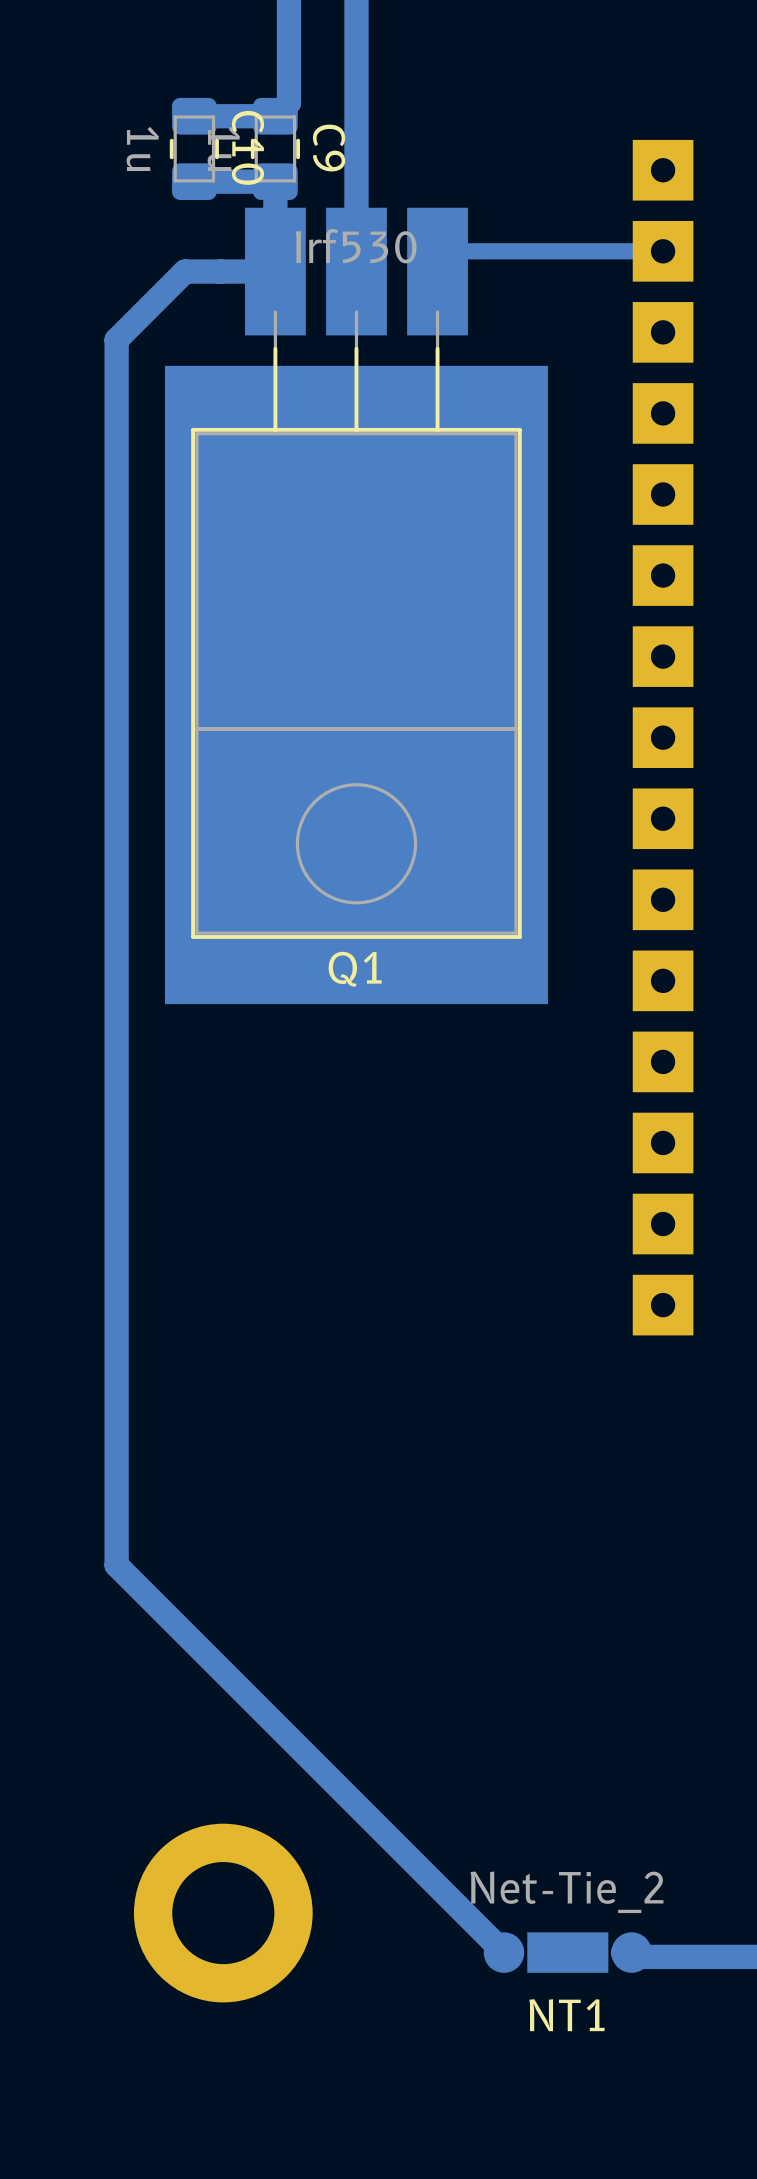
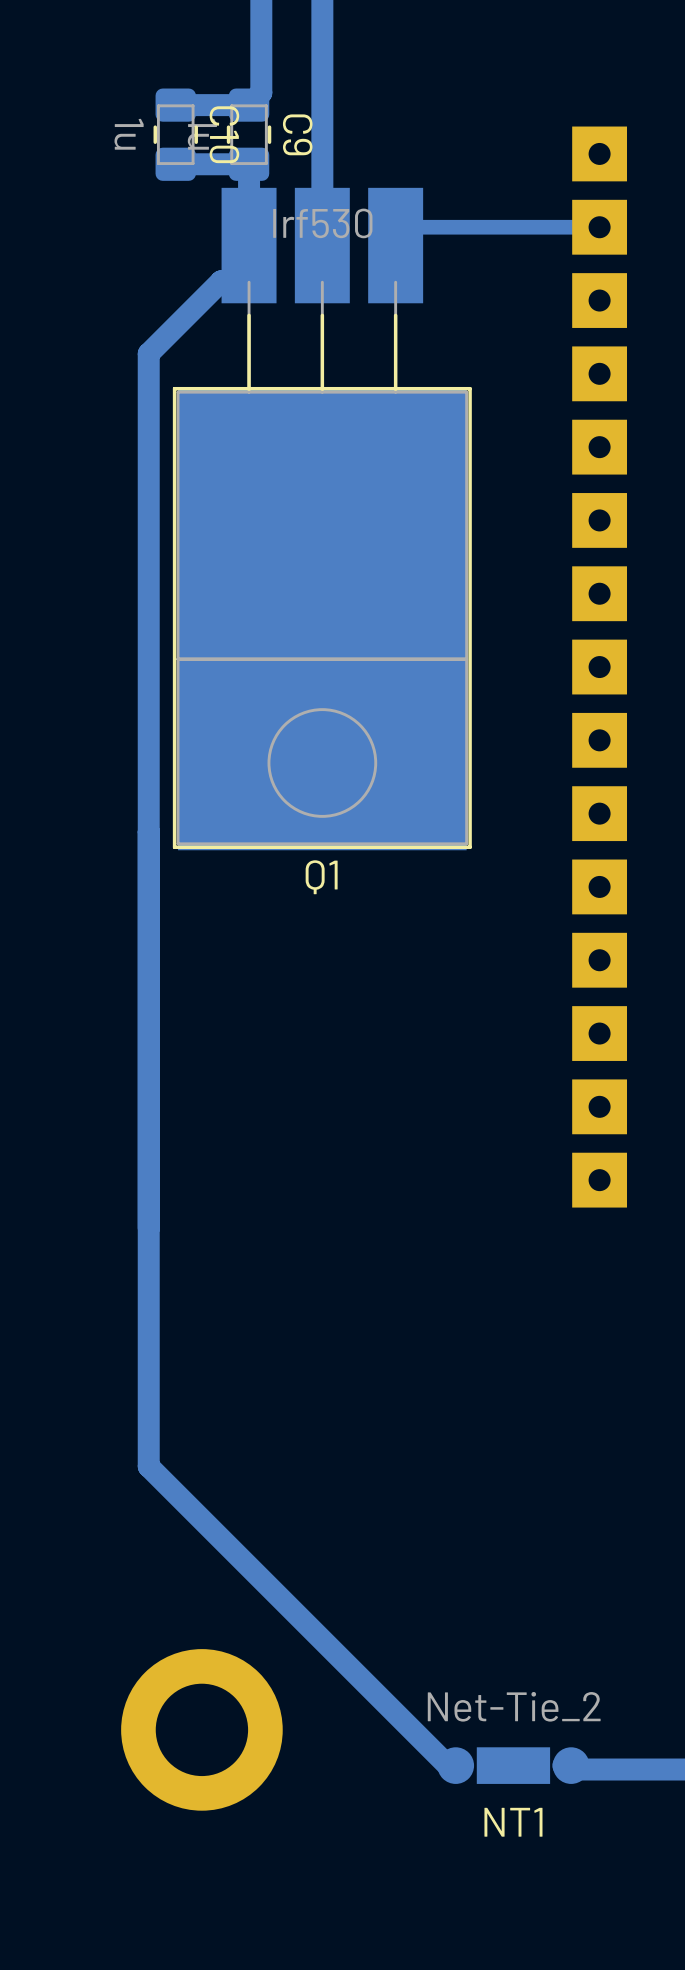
Q1 footprint: [164, 207, 548, 1005] -> [172, 187, 472, 851]
bottom track: (275, 271) (184, 271) (116, 339) (116, 1565) (503, 1952) -> none
bottom track: none -> (249, 281) (221, 281) (148, 353) (148, 1466) (447, 1765)

